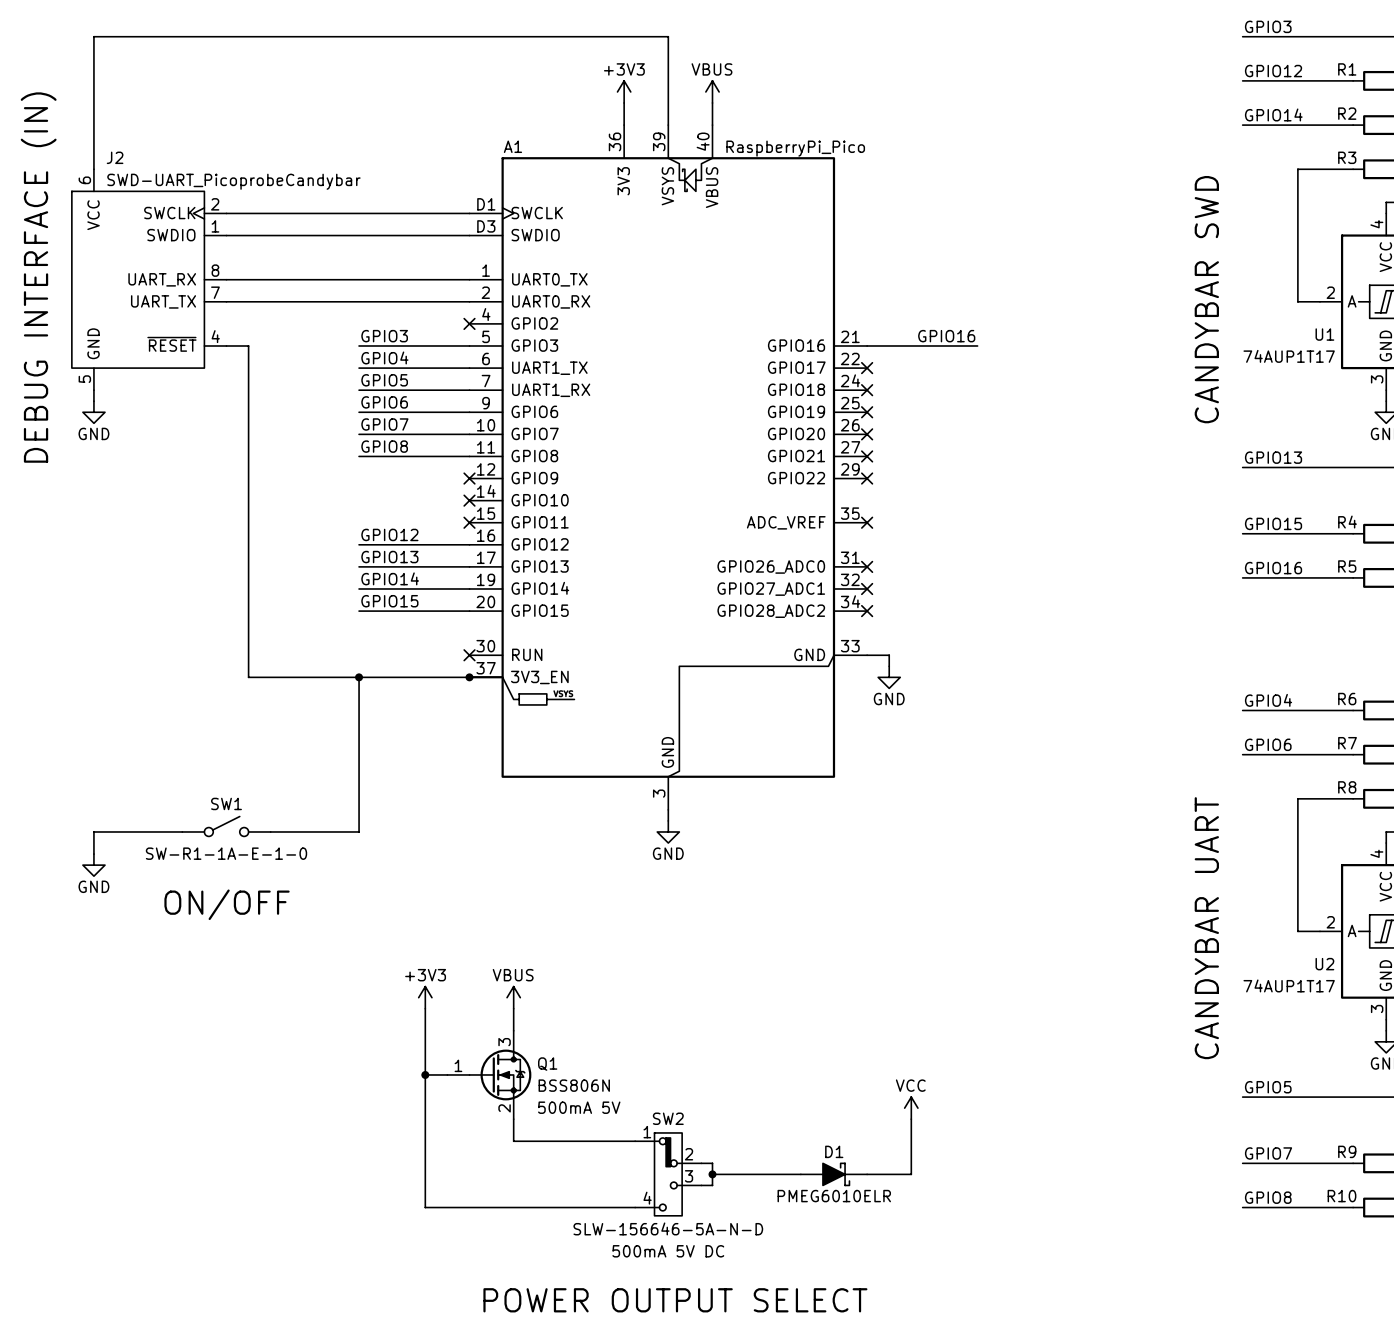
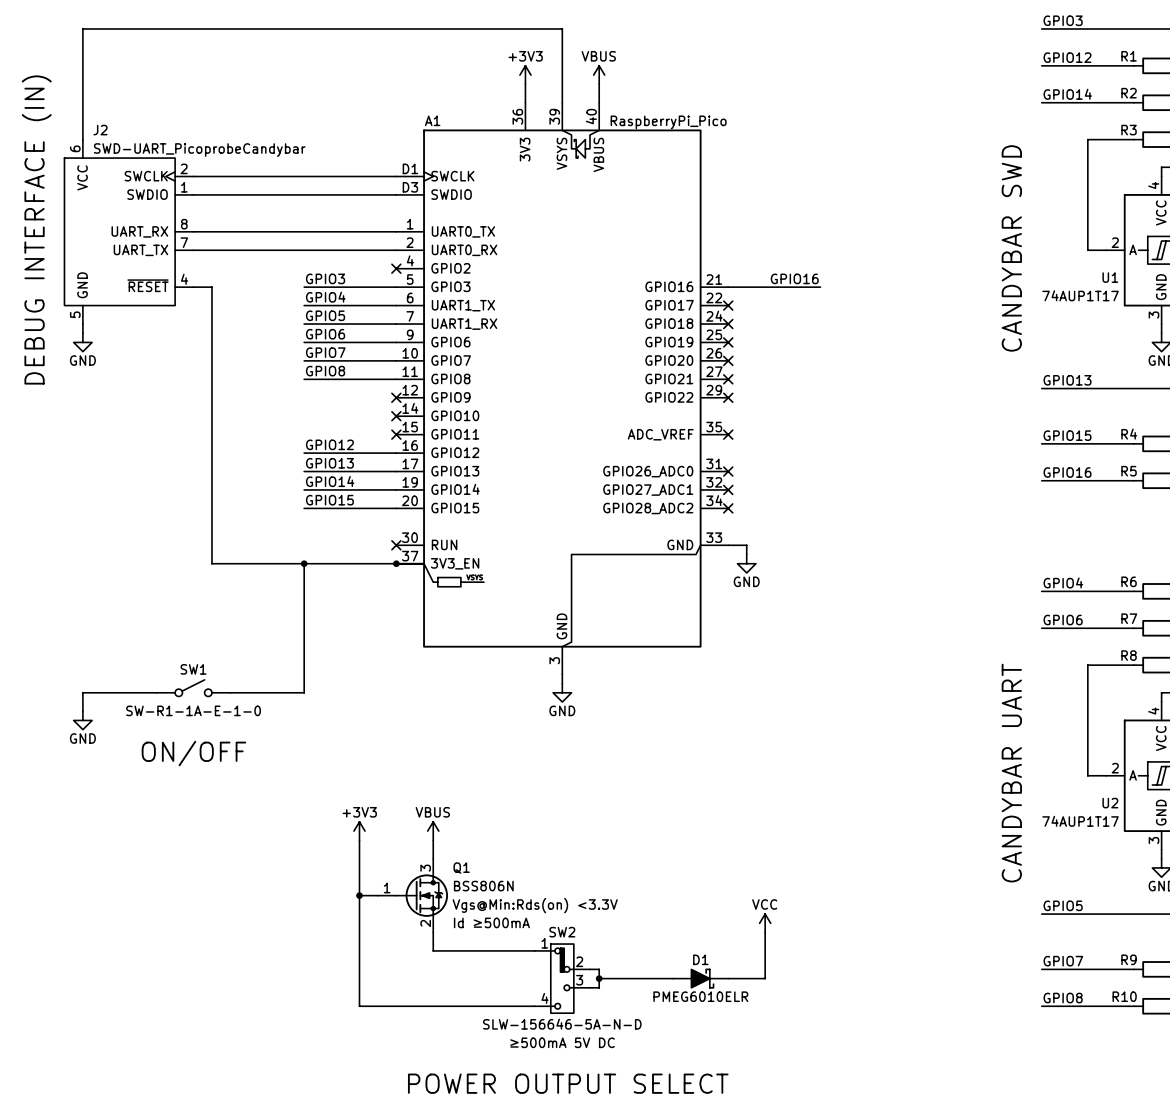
Q1 name position: Q1 (547, 1064) -> Q1 (461, 868)
Q1 value position: BSS806N (574, 1085) -> BSS806N (483, 886)
Q1 text: 500mA 5V (579, 1107) -> Vgs@Min:Rds(on) <3.3V (535, 905)
Q1 text: none -> Id ≥500mA (491, 922)
SW2 text: 500mA 5V DC (668, 1251) -> ≥500mA 5V DC (562, 1042)

